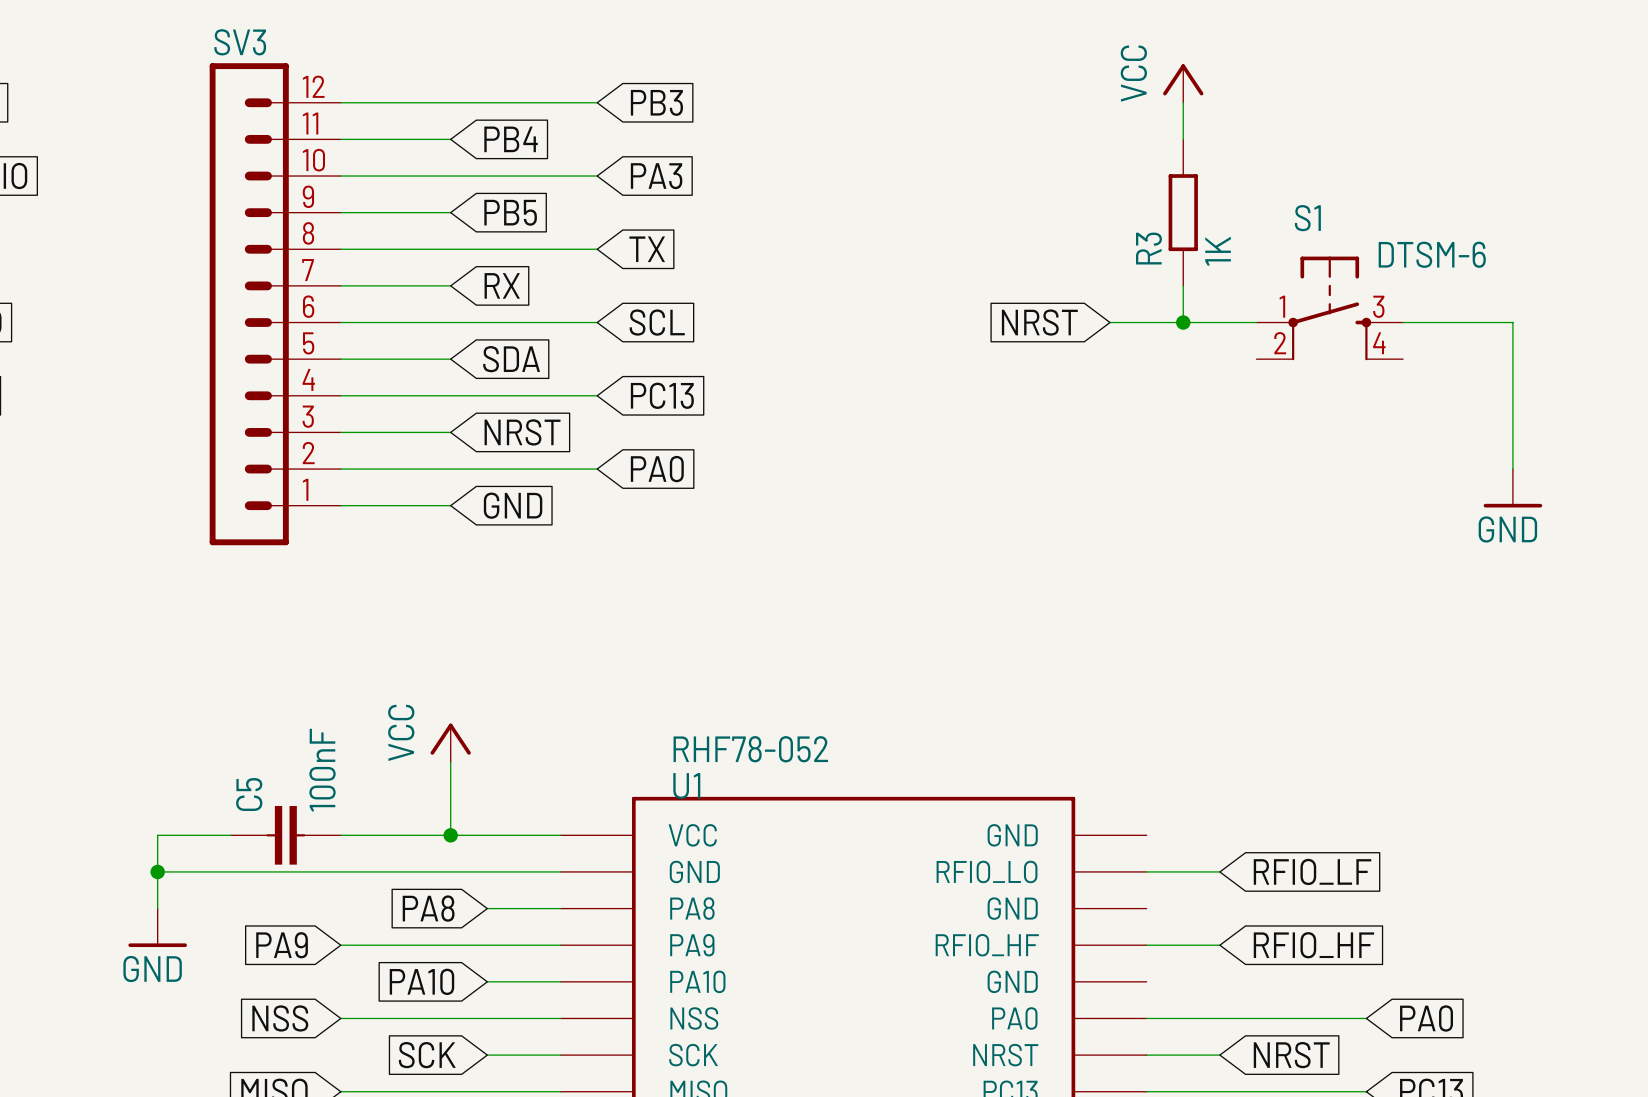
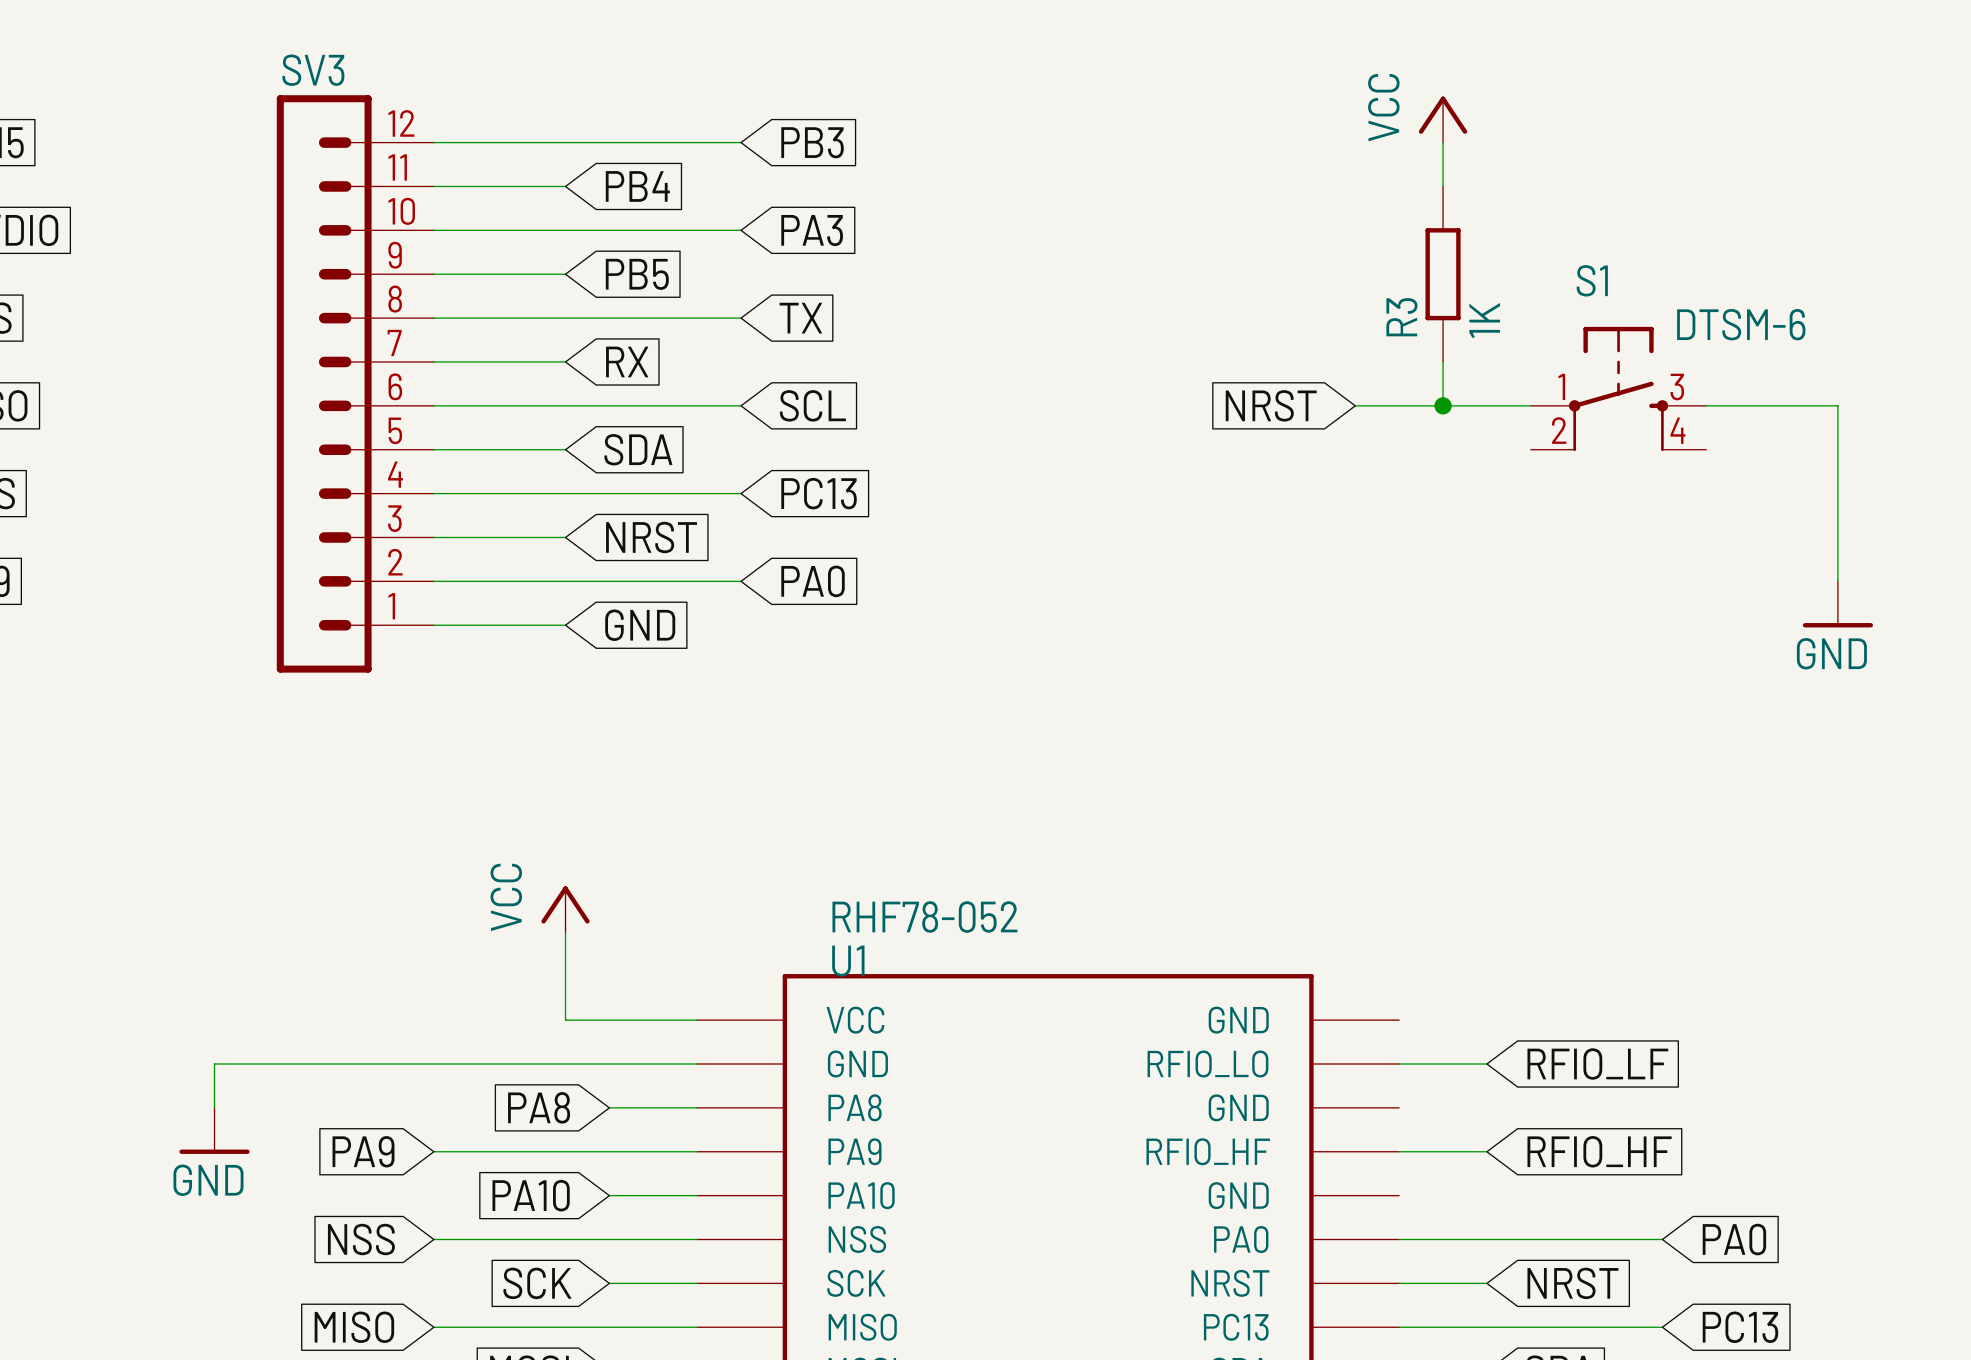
wire: (230, 835) (157, 835) (157, 871) -> none
C5: 100nF (285, 835) -> none
wire: (340, 835) (450, 835) -> none
junction: (450, 835) -> none
junction: (157, 871) -> none

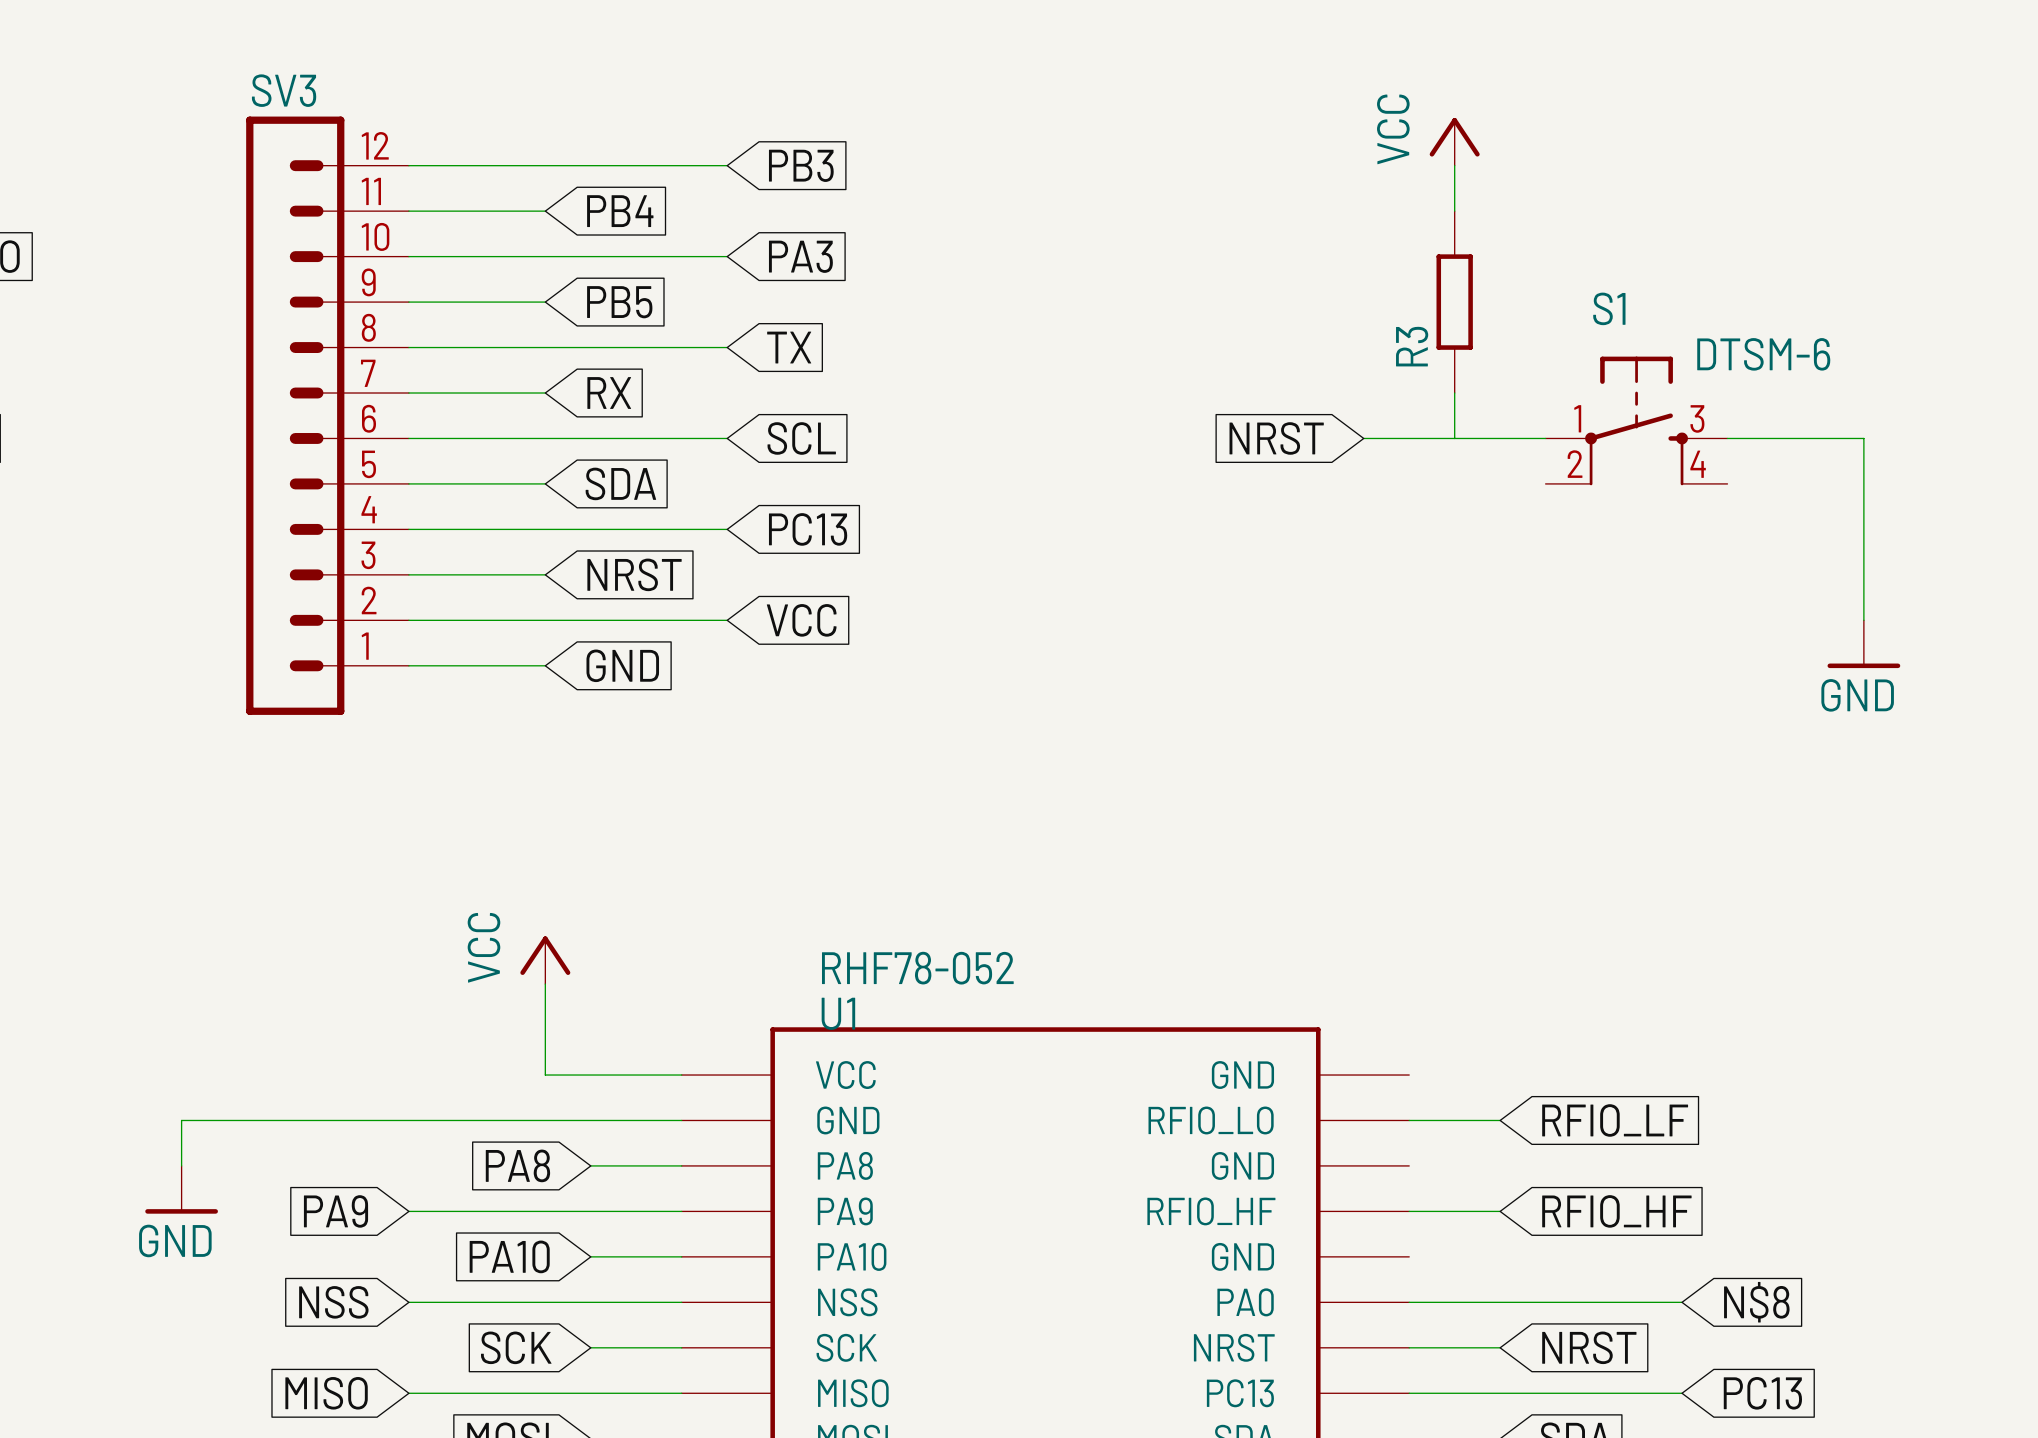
R3 value: 1K (1484, 320) -> none
junction: (1443, 405) -> none
global label: PA0 (813, 581) -> VCC (801, 620)
global label: PA0 (1734, 1239) -> N$8 (1756, 1302)

